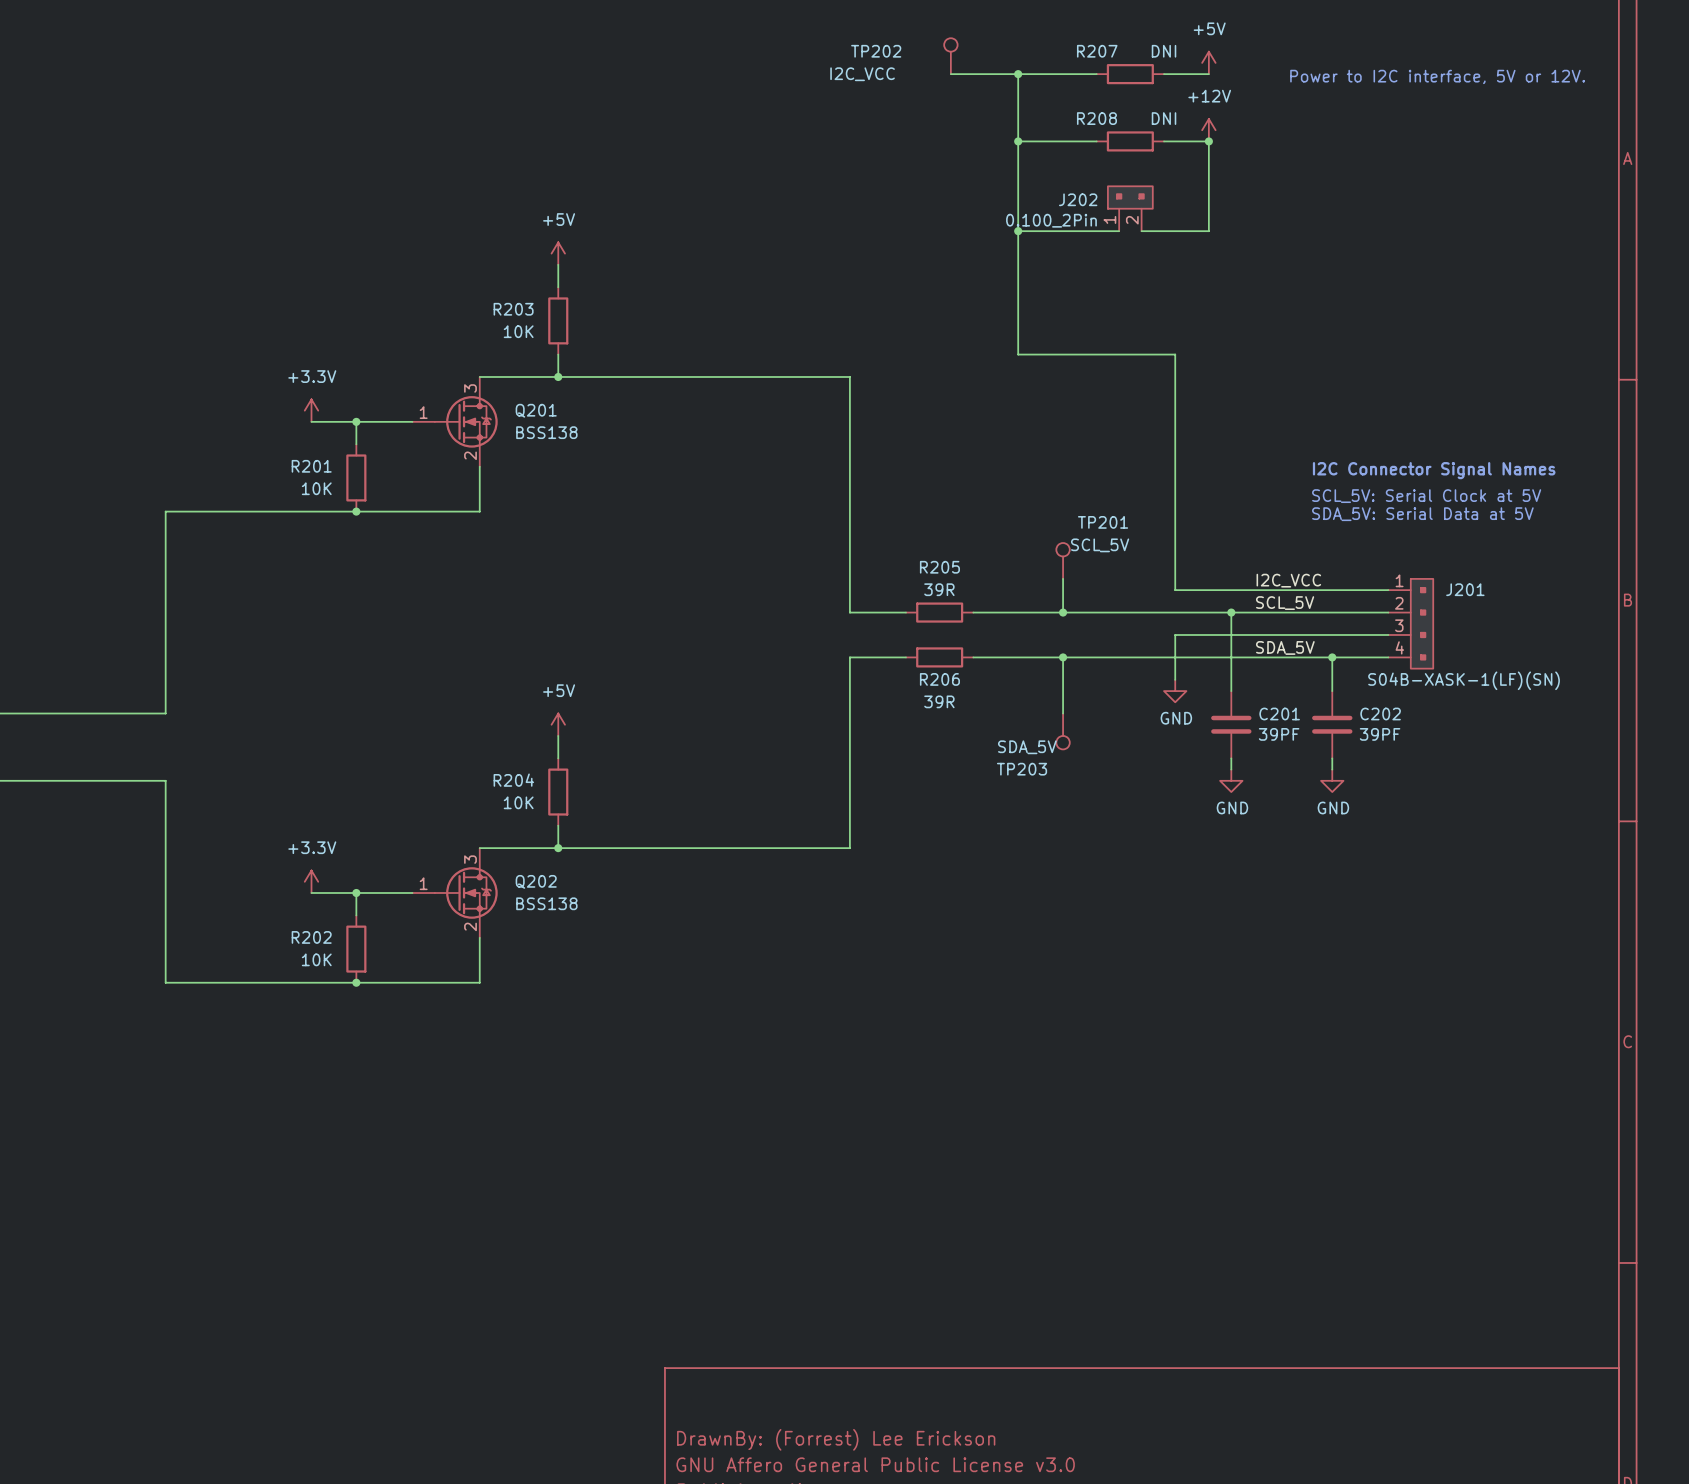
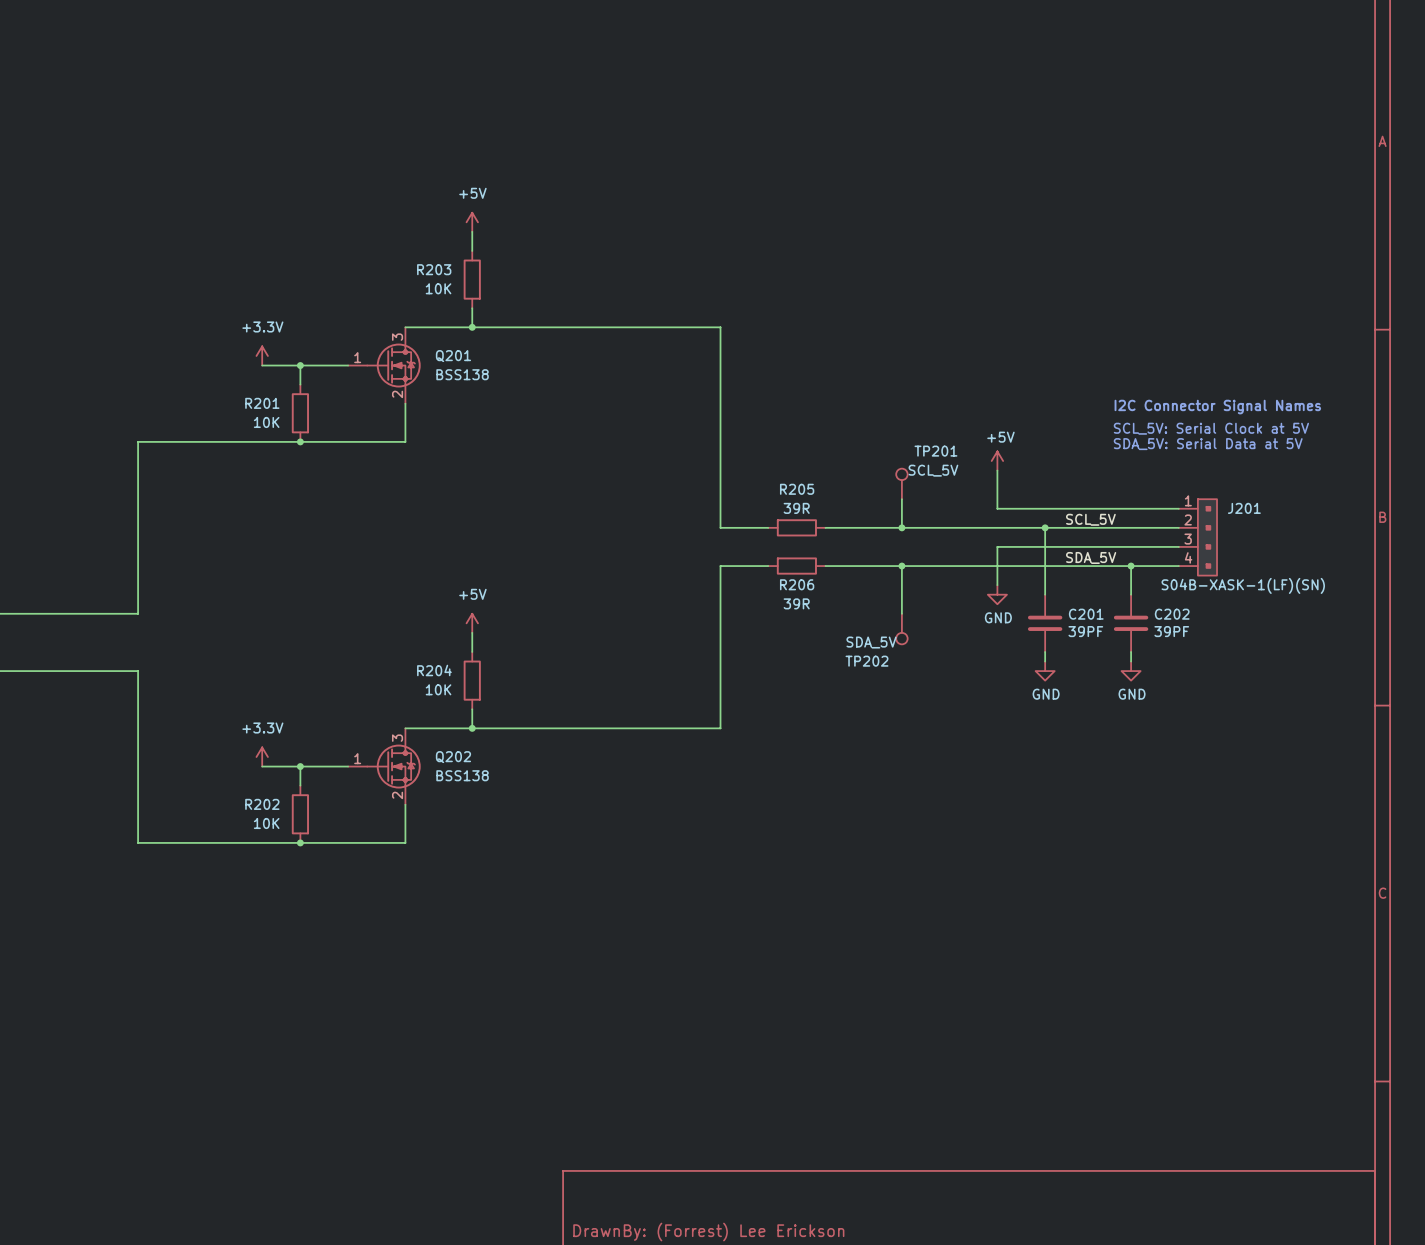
TP202: I2C_VCC (950, 56) -> none
power symbol: +5V (1208, 62) -> none
wire: (950, 74) (1096, 74) -> none
wire: (1018, 74) (1018, 354) (1175, 354) (1175, 545) -> none
junction: (1018, 74) -> none
R207: DNI (1130, 74) -> none
wire: (1164, 74) (1208, 74) -> none
text: Power to I2C interface, 5V or 12V. (1437, 76) -> none
power symbol: +12V (1208, 130) -> none
wire: (1018, 141) (1096, 141) -> none
junction: (1018, 141) -> none
R208: DNI (1130, 141) -> none
wire: (1164, 141) (1208, 141) (1208, 231) (1141, 231) -> none
junction: (1208, 141) -> none
J202: 0.100_2Pin (1130, 208) -> none
wire: (1018, 231) (1119, 231) -> none
junction: (1018, 231) -> none
power symbol: none -> +5V (997, 461)
label: I2C_VCC (1288, 580) -> none
TP203 name: TP203 (1022, 769) -> TP202 (866, 661)

